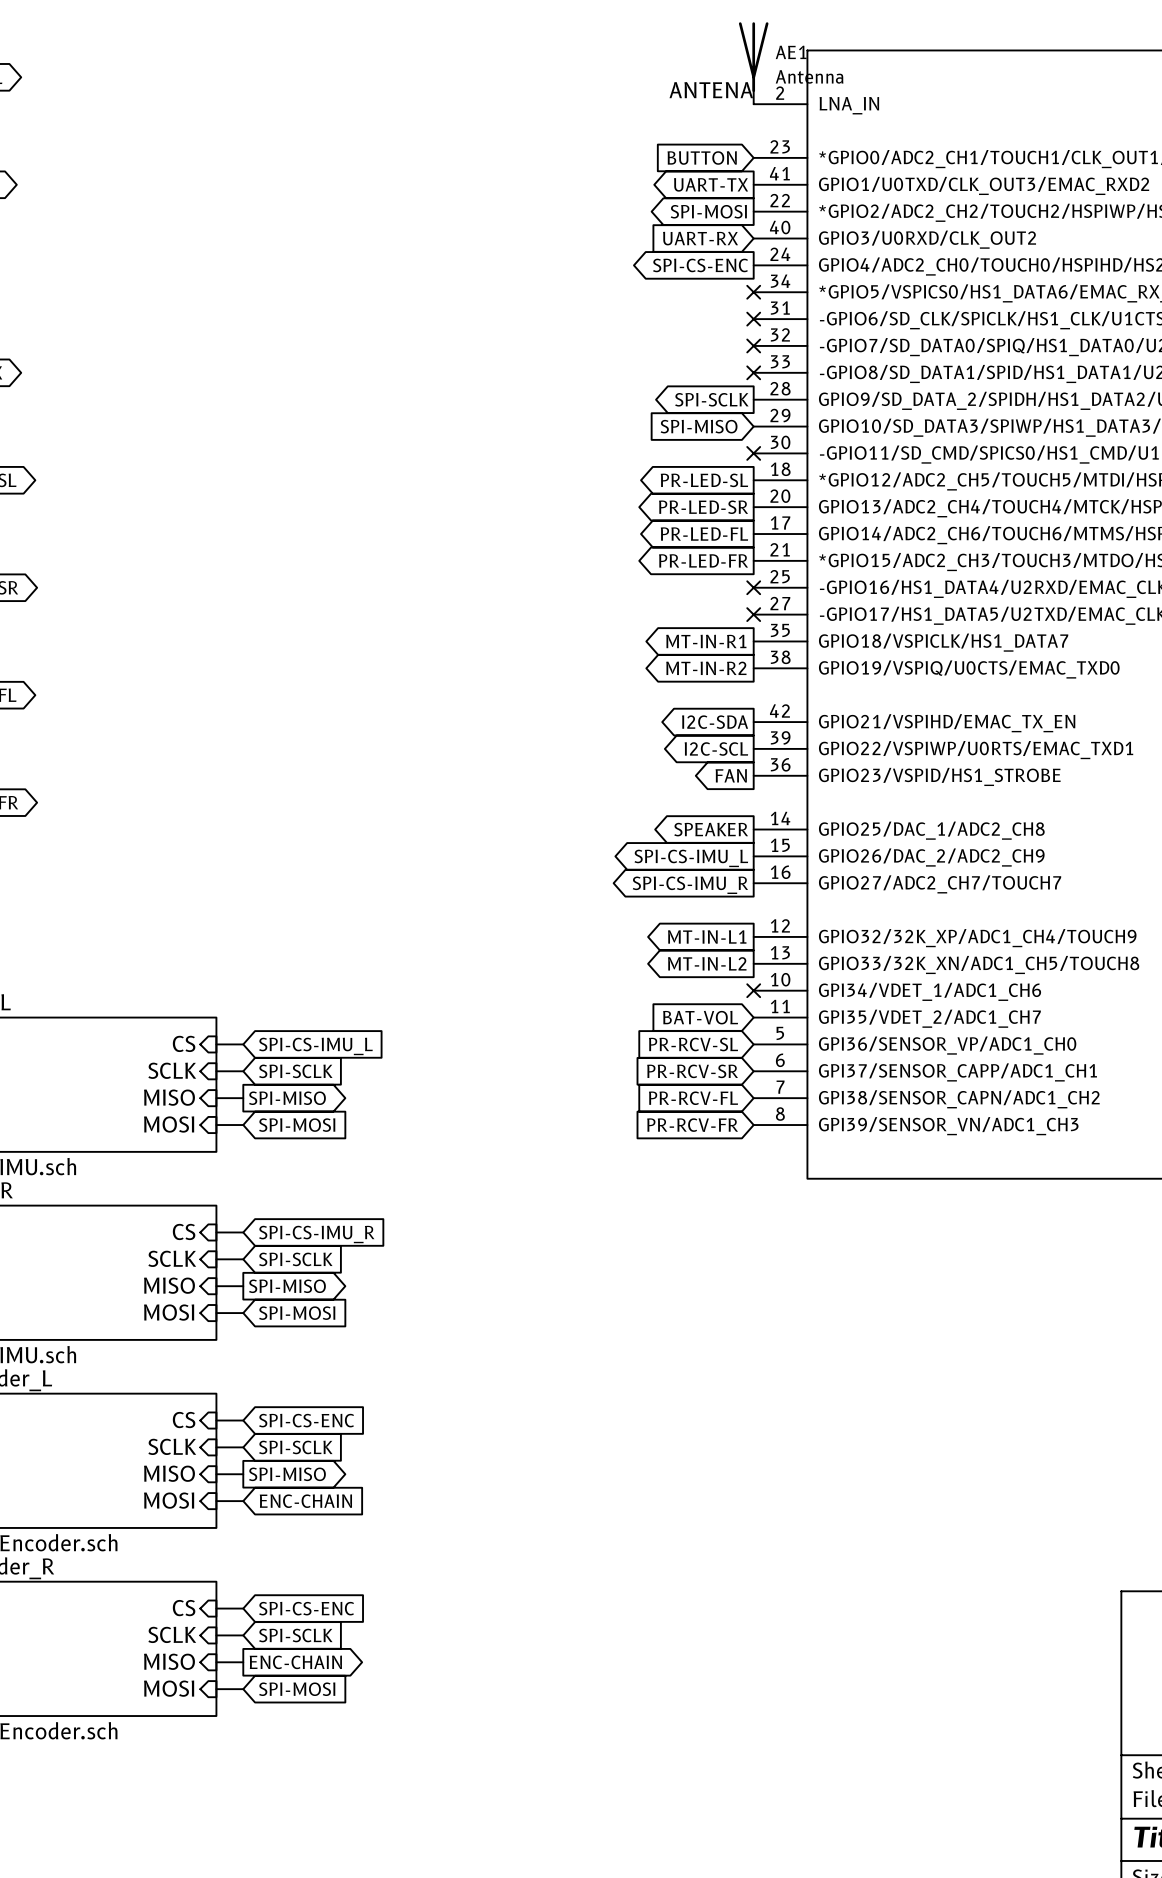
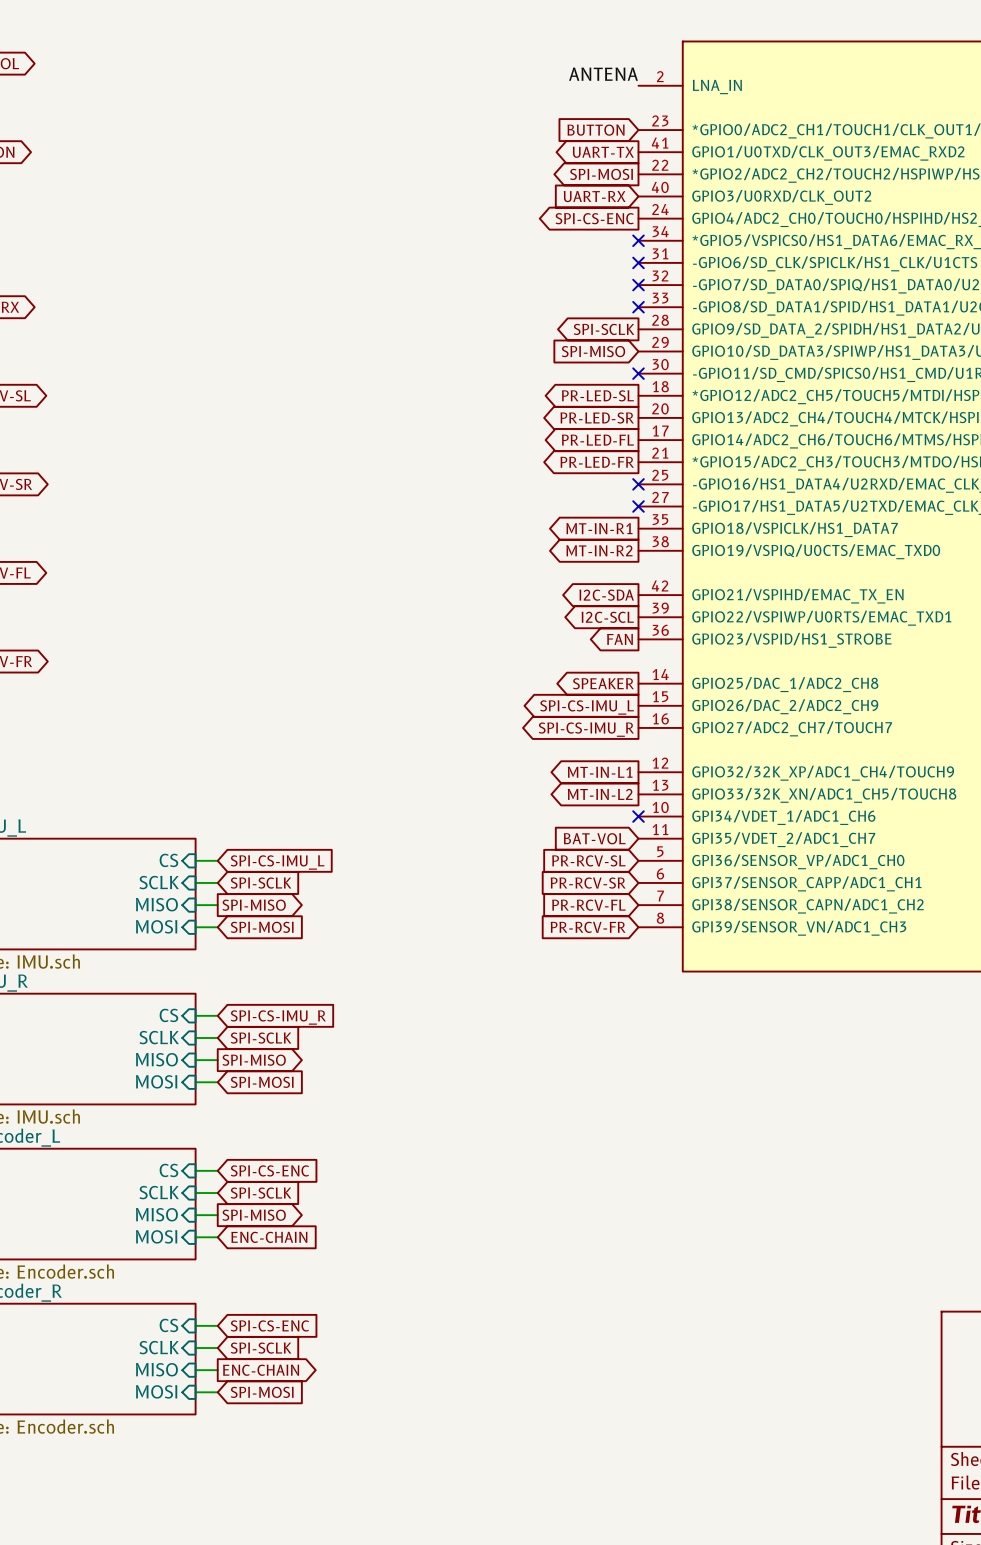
AE1: Antenna (753, 63) -> none

